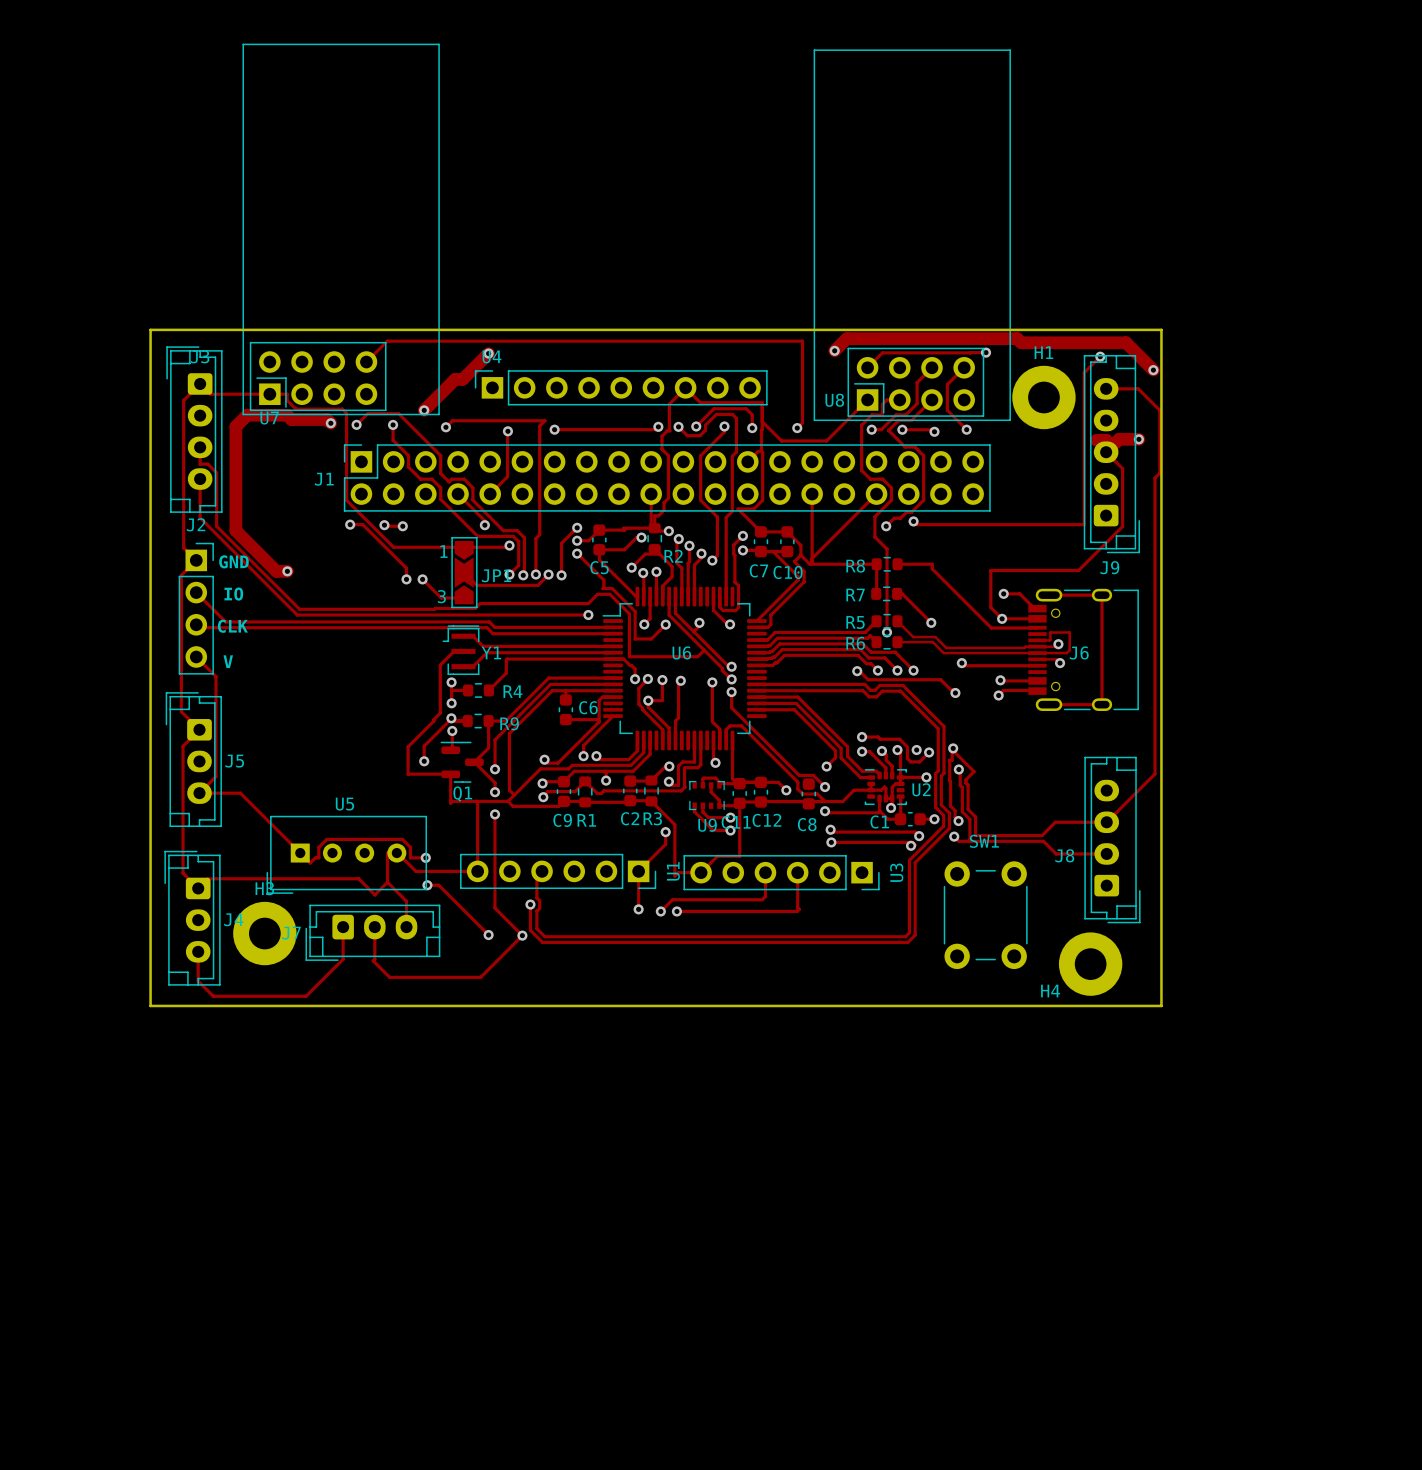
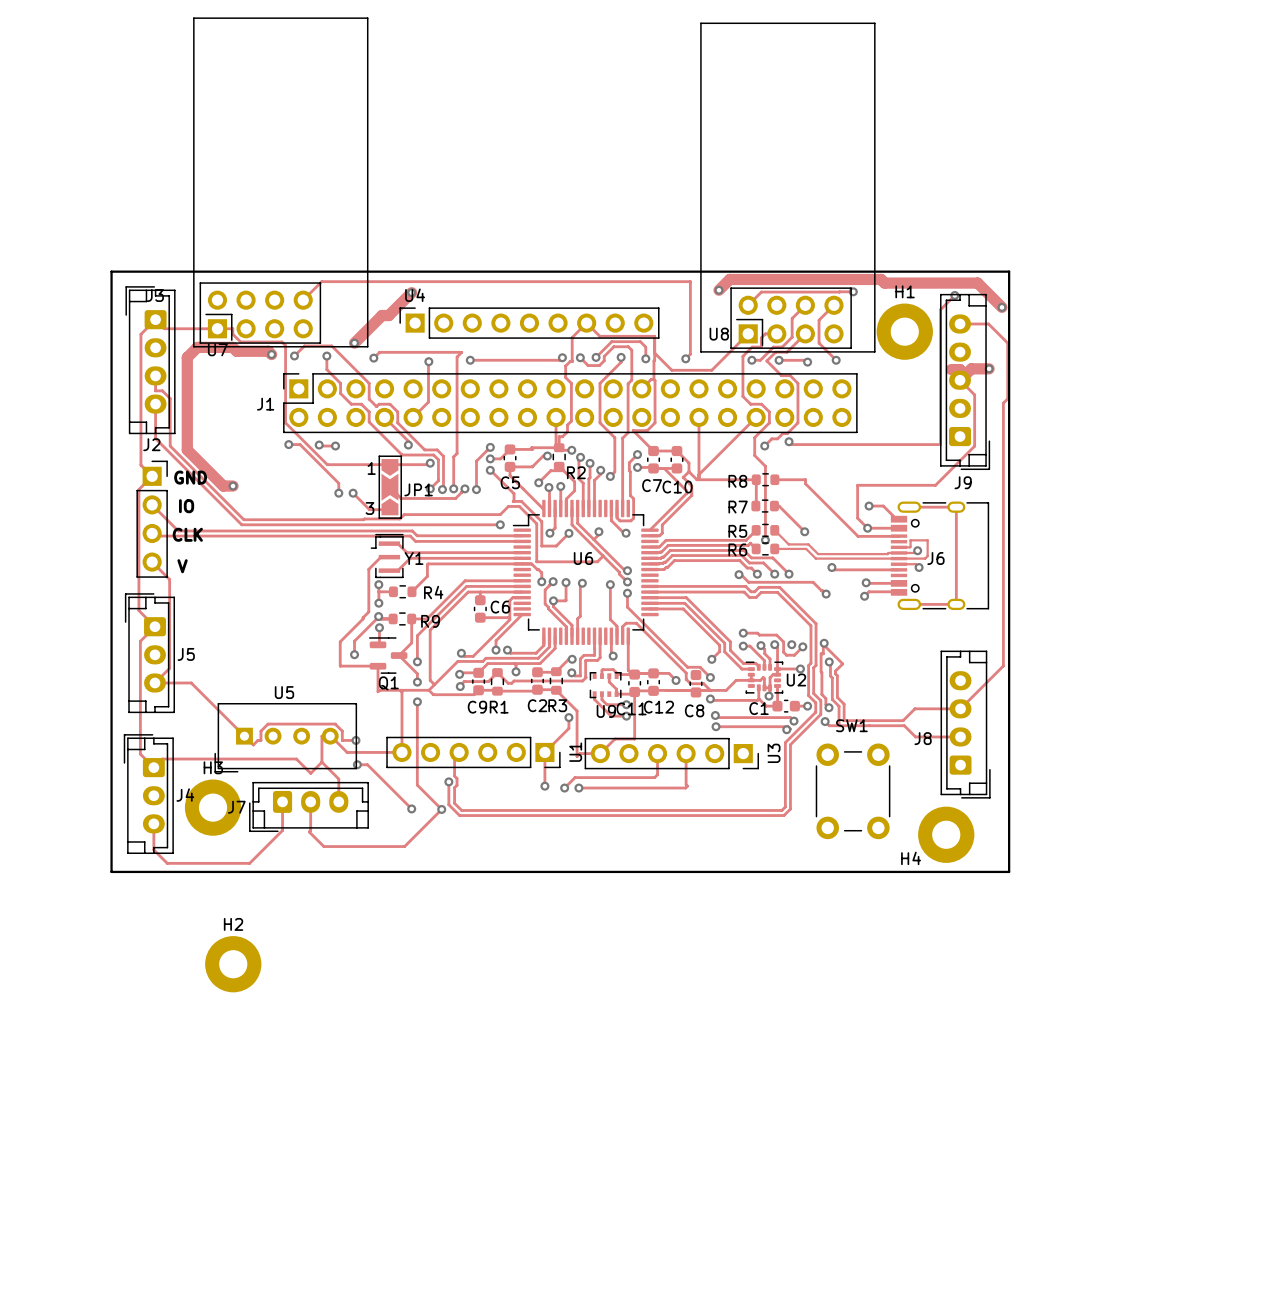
H2: none -> (233, 964)

